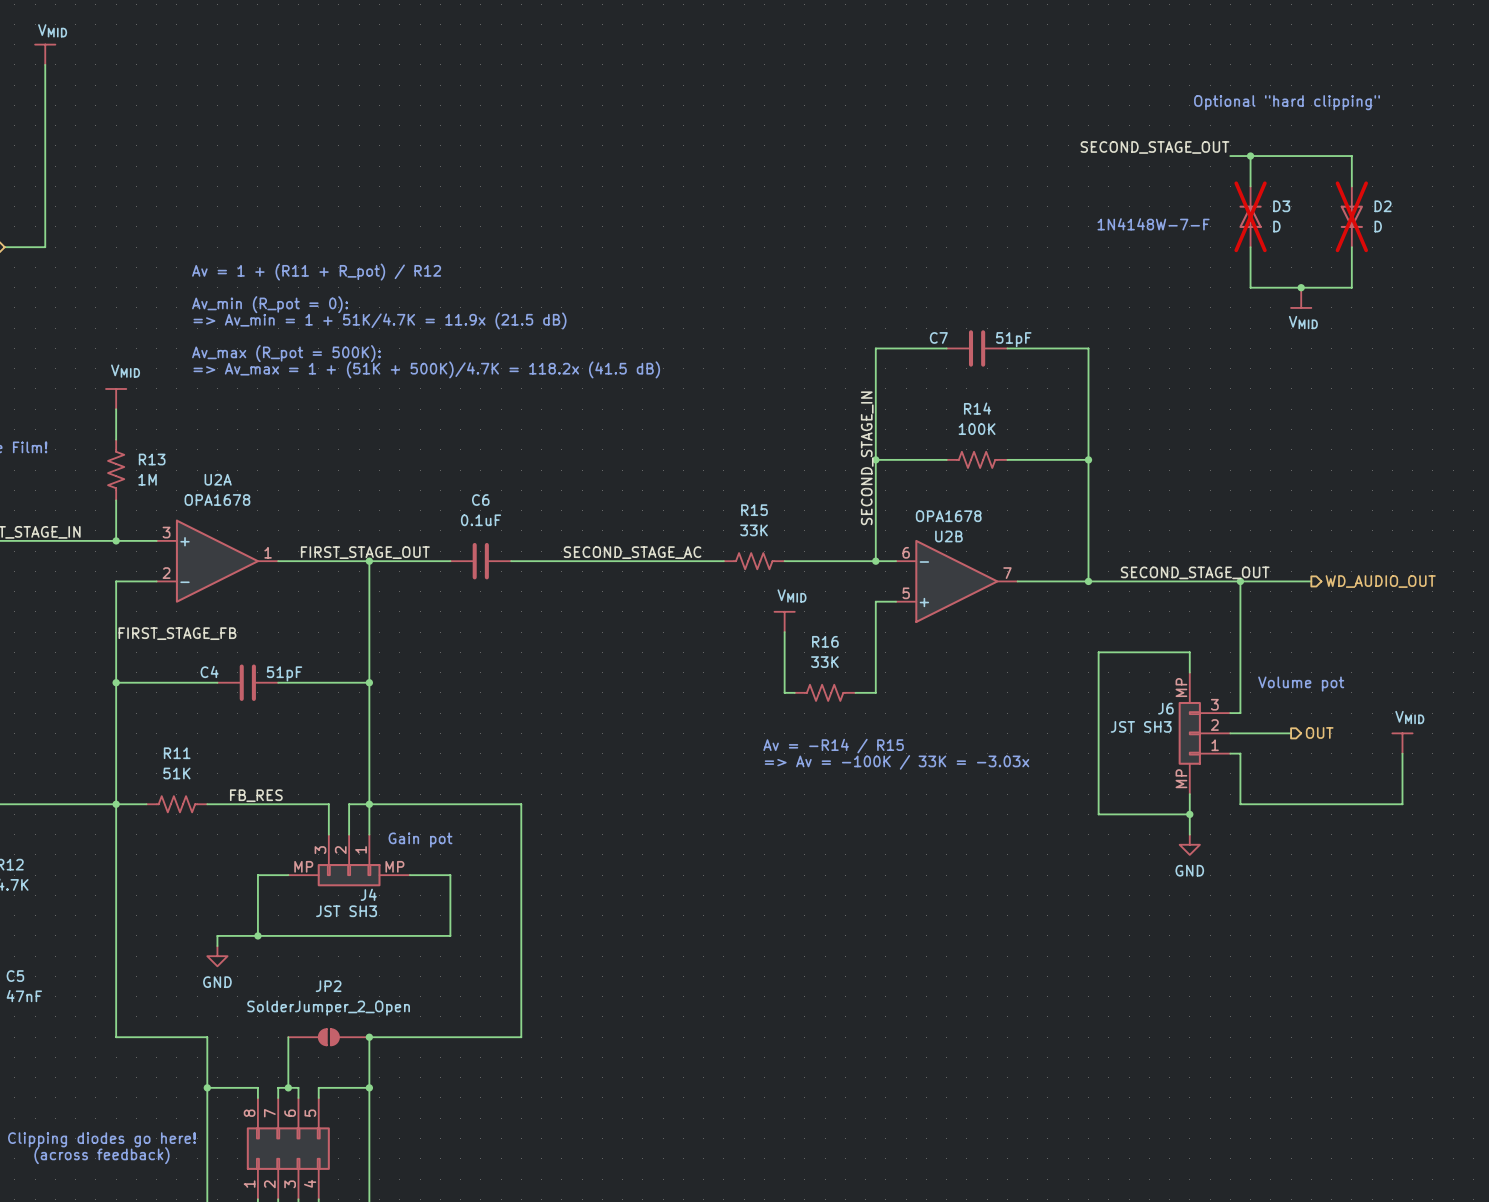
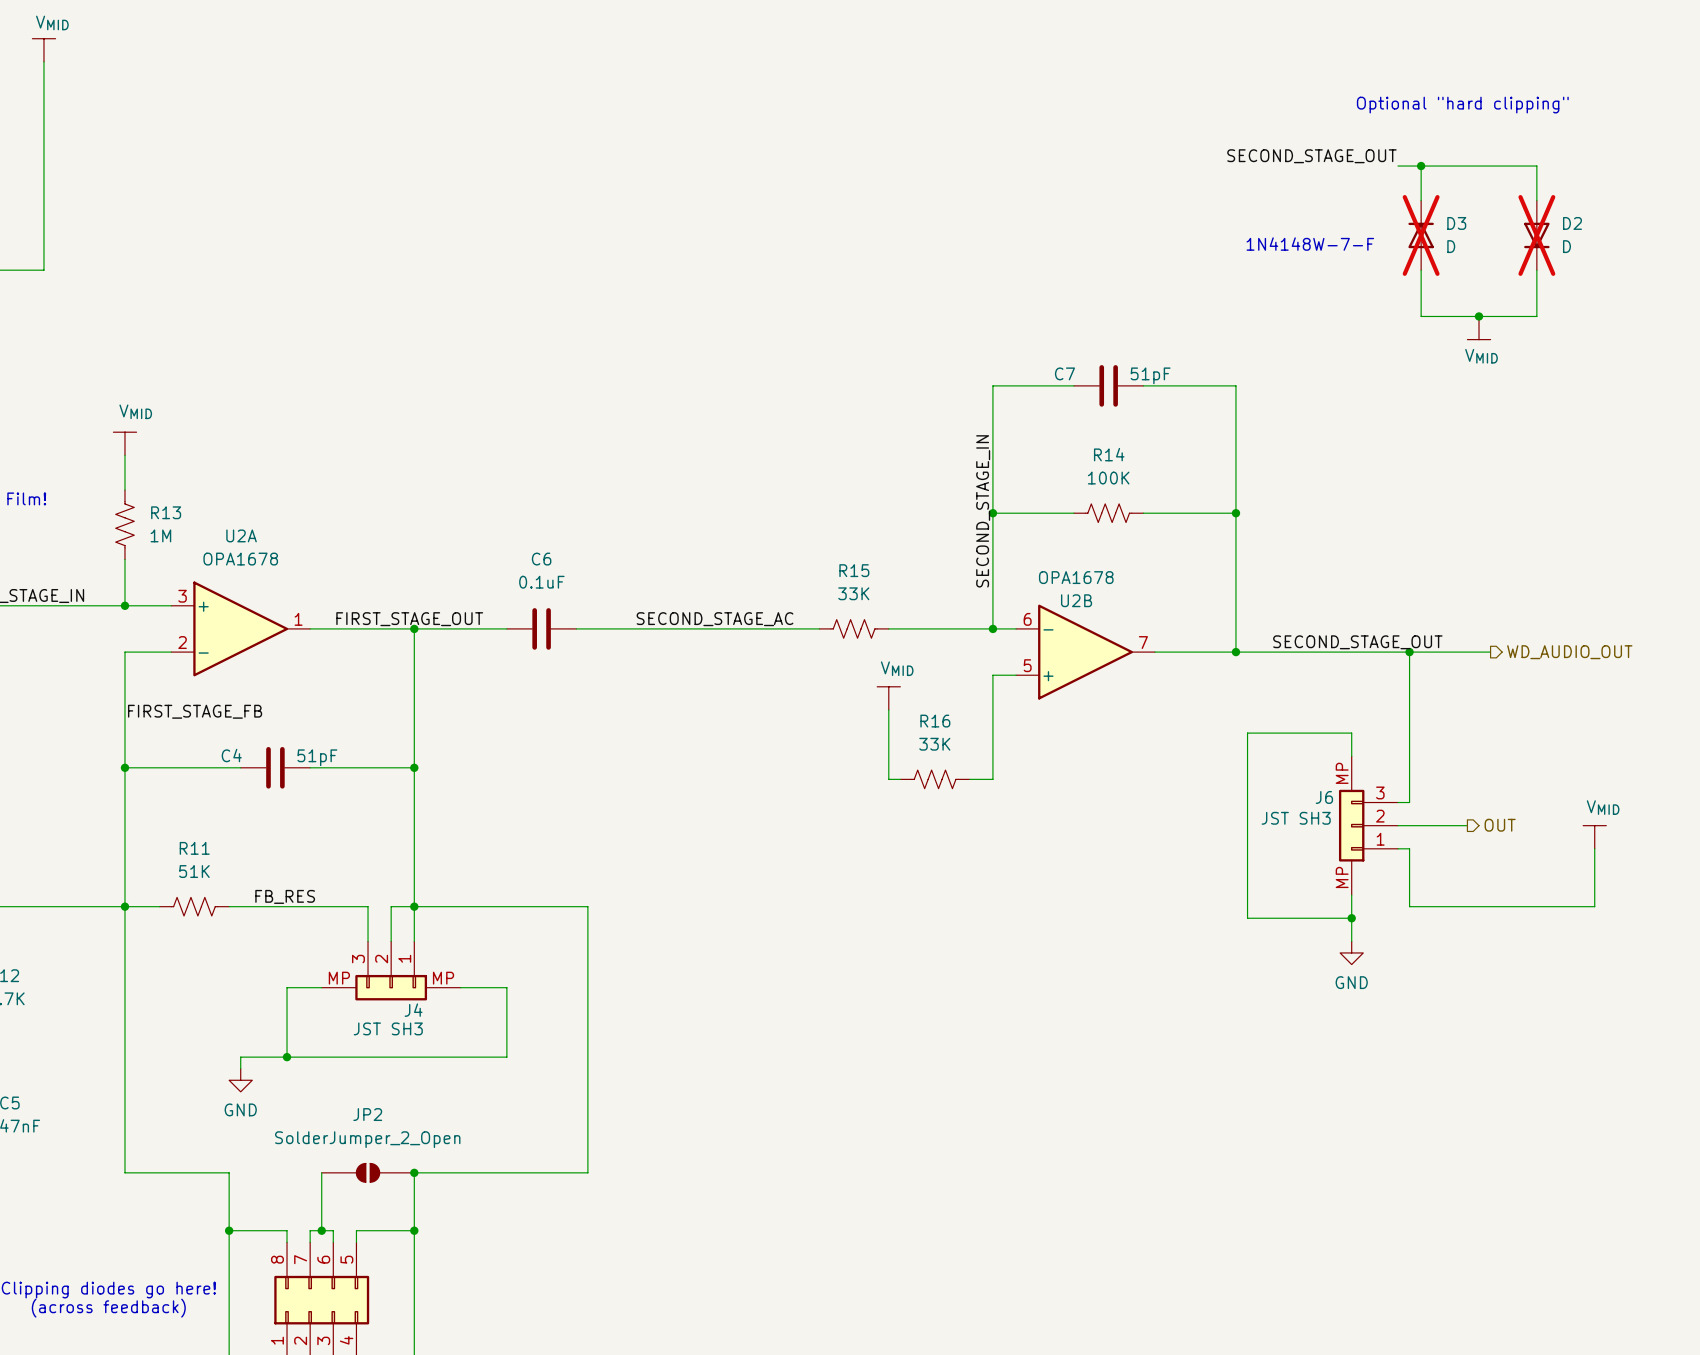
text: Av = 1 + (R11 + R_pot) / R12 (316, 272) -> none
text: Av_min (R_pot = 0): (270, 304) -> none
text: => Av_min = 1 + 51K/4.7K = 11.9x (21.5 dB) (380, 320) -> none
text: Av_max (R_pot = 500K): (286, 353) -> none
text: => Av_max = 1 + (51K + 500K)/4.7K = 118.2x (41.5 dB) (426, 369) -> none
text: Volume pot (1301, 684) -> none
text: Av = -R14 / R15 (833, 746) -> none
text: => Av = -100K / 33K = -3.03x (896, 762) -> none
text: Gain pot (420, 840) -> none

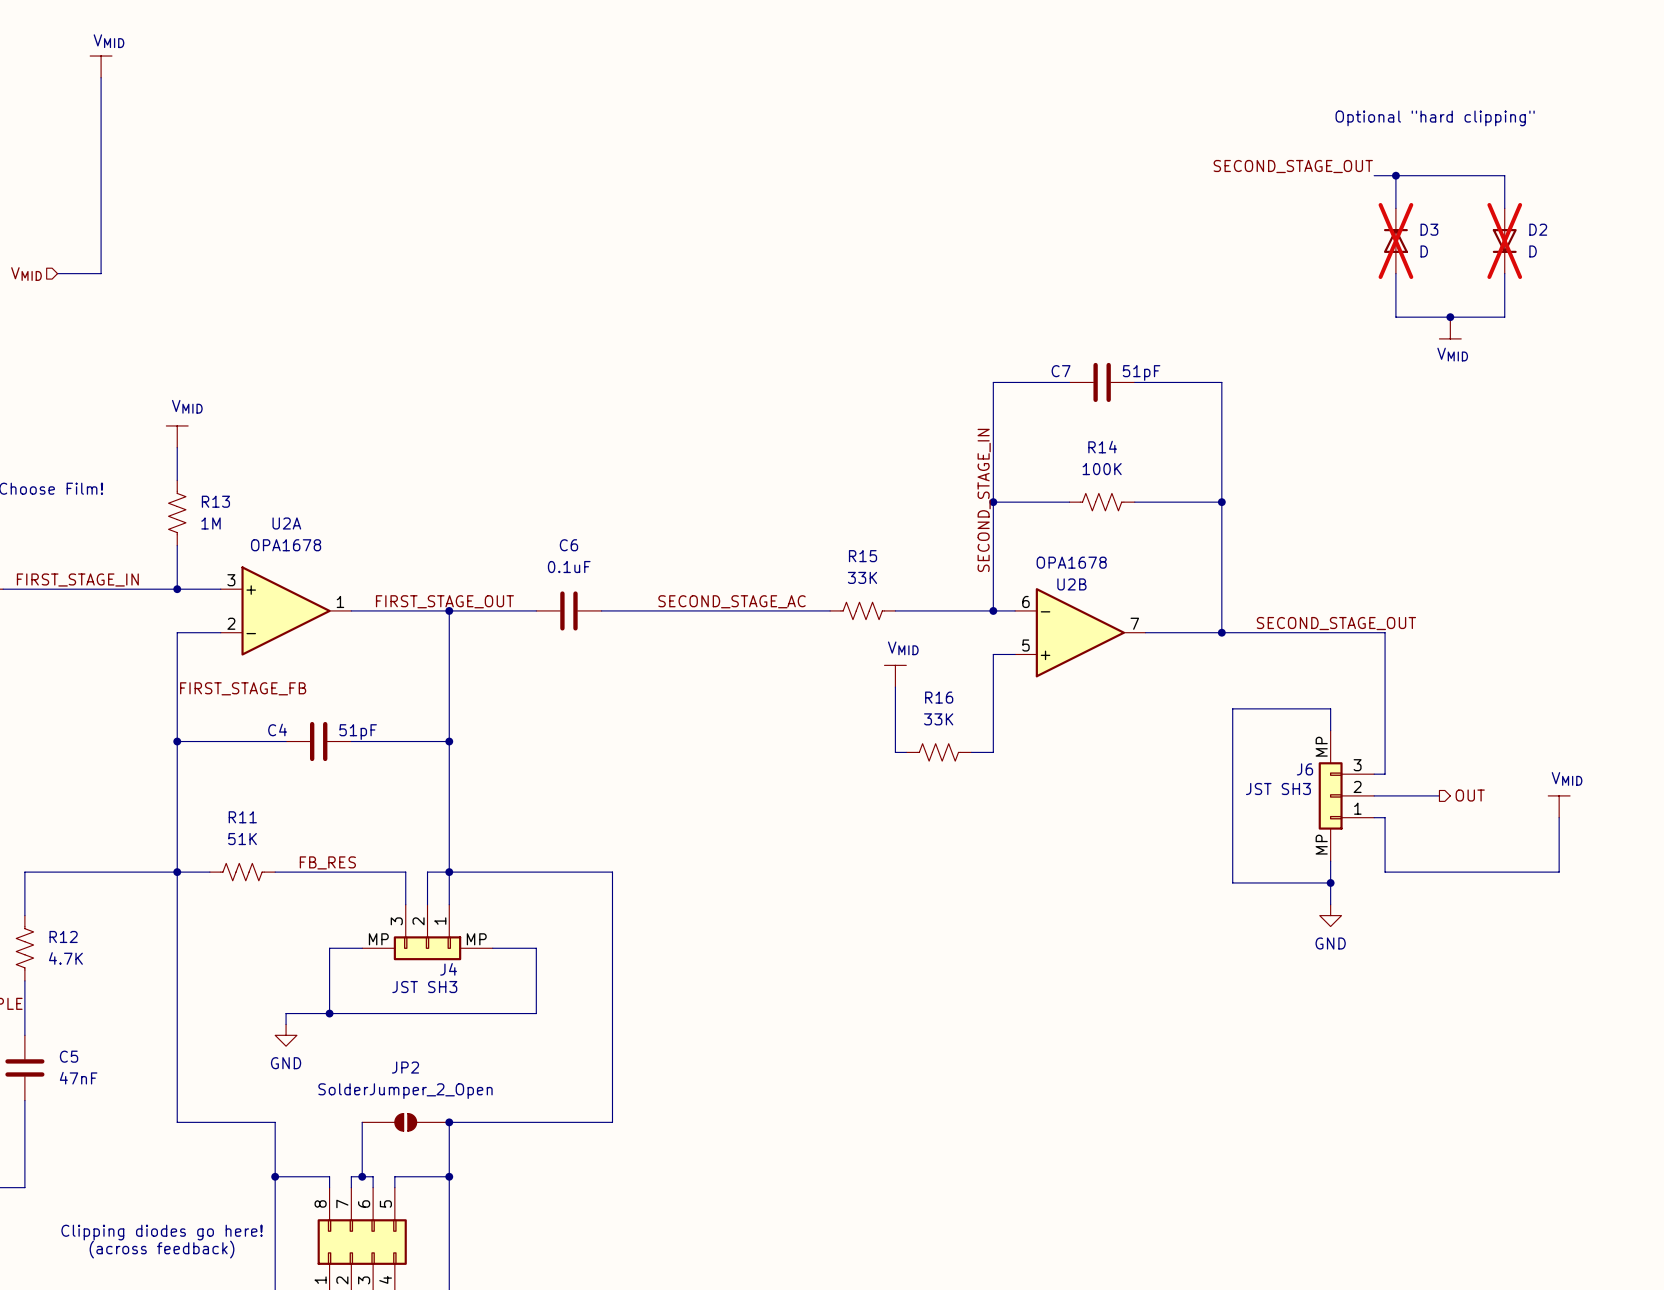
text: 1N4148W-7-F (1310, 244) -> none
wire: (1409, 652) (1490, 652) -> none
junction: (1409, 652) -> none
hierarchical label: WD_AUDIO_OUT (1569, 652) -> none

